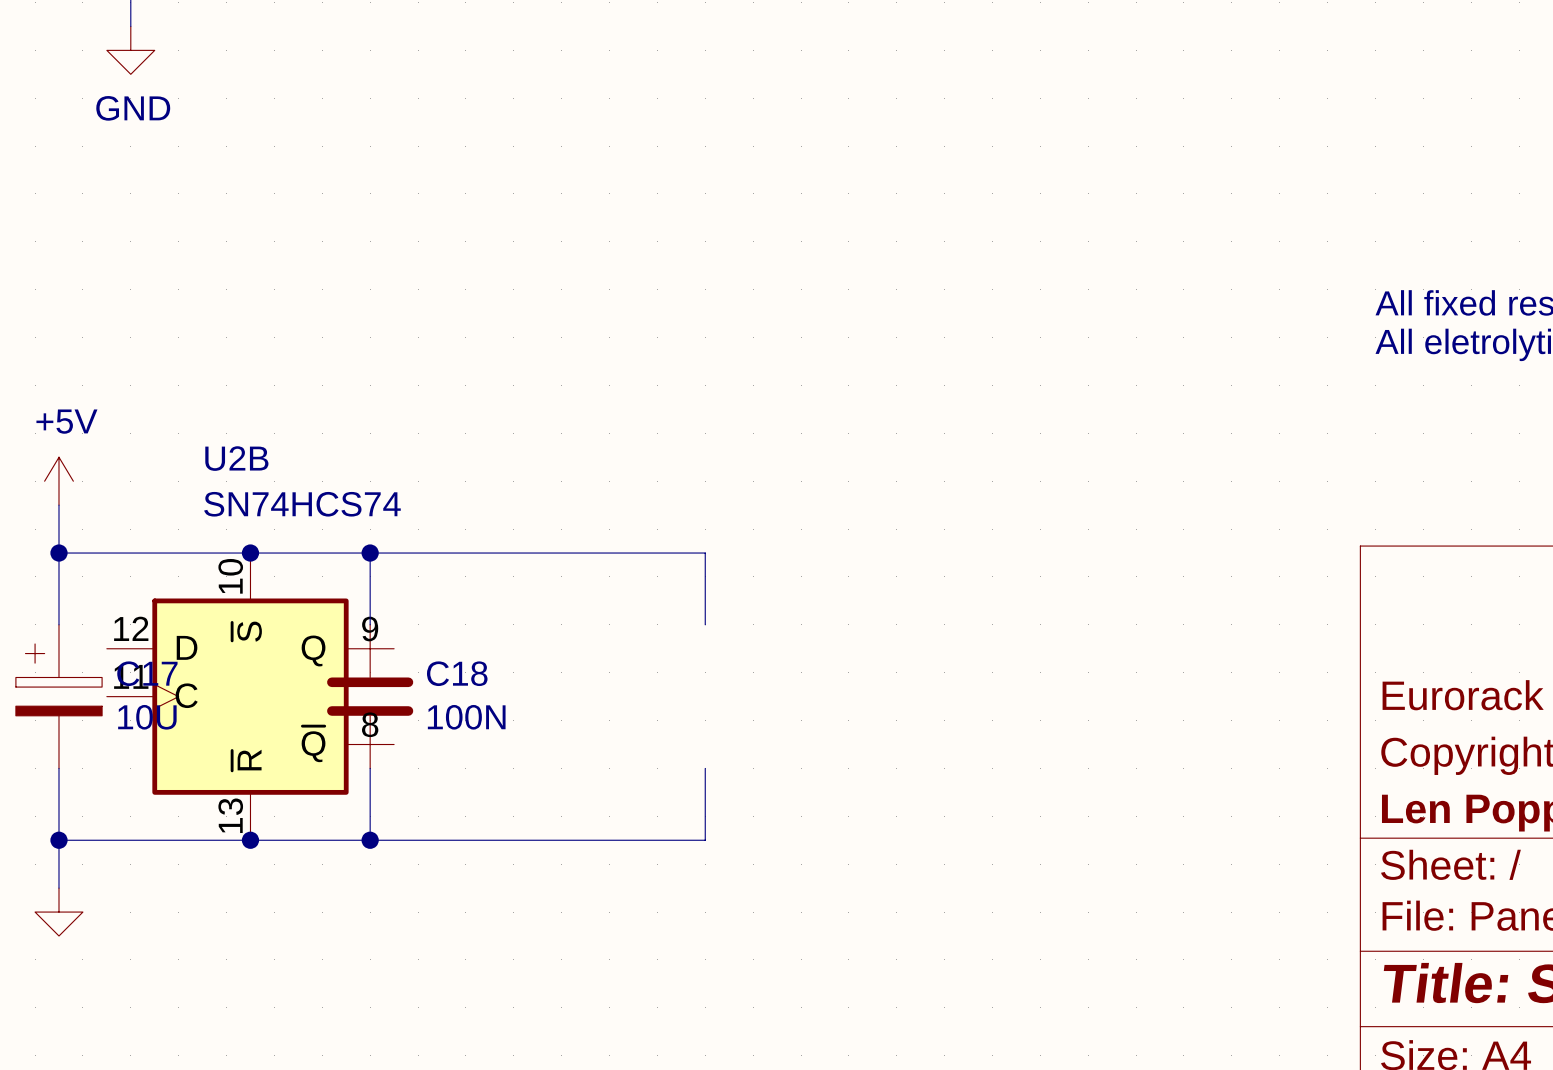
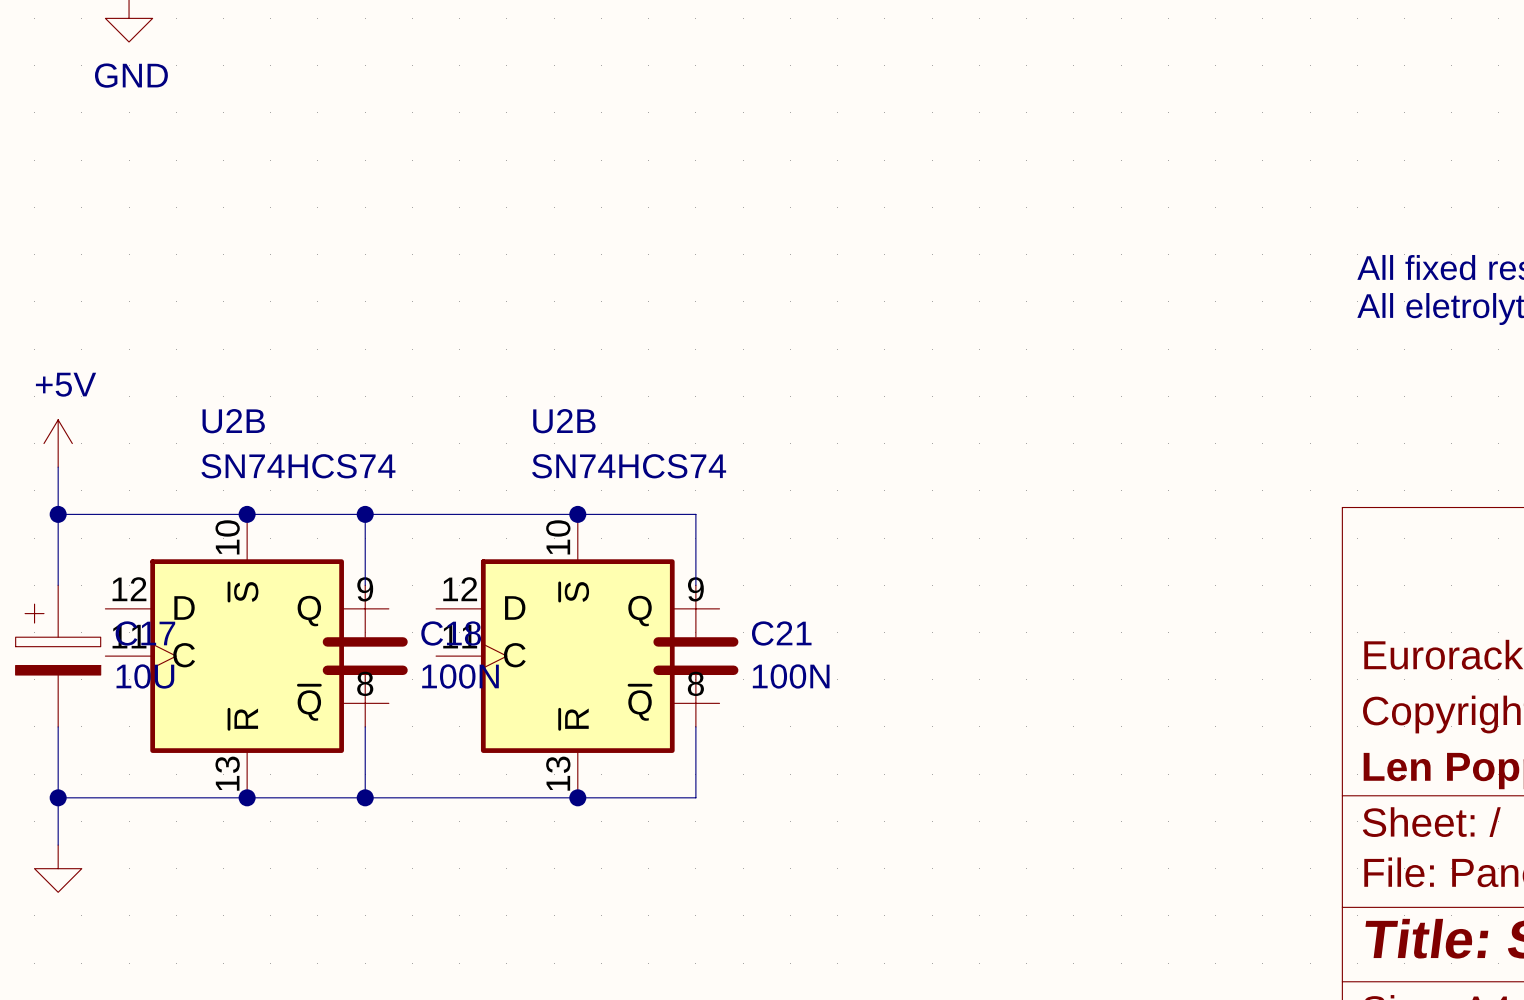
junction: none -> (577, 514)
U2B: none -> SN74HCS74 (577, 656)
C21: none -> 100N (695, 656)
junction: none -> (577, 797)

